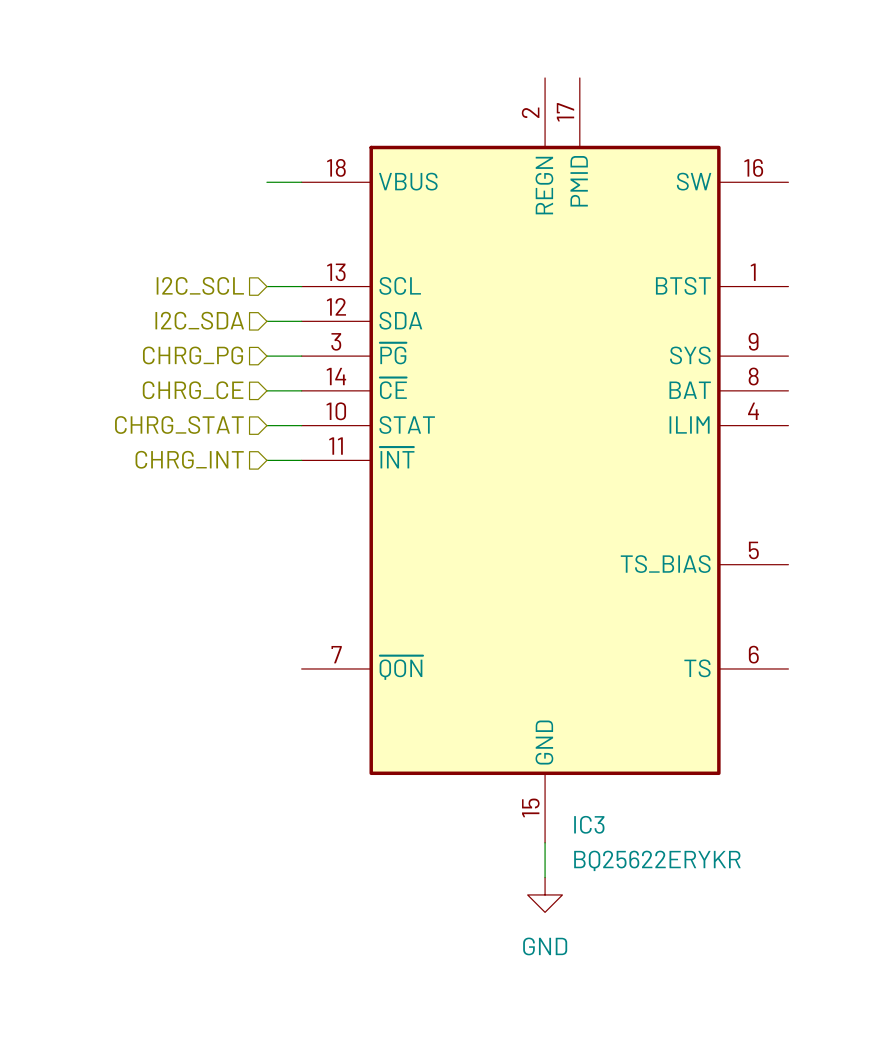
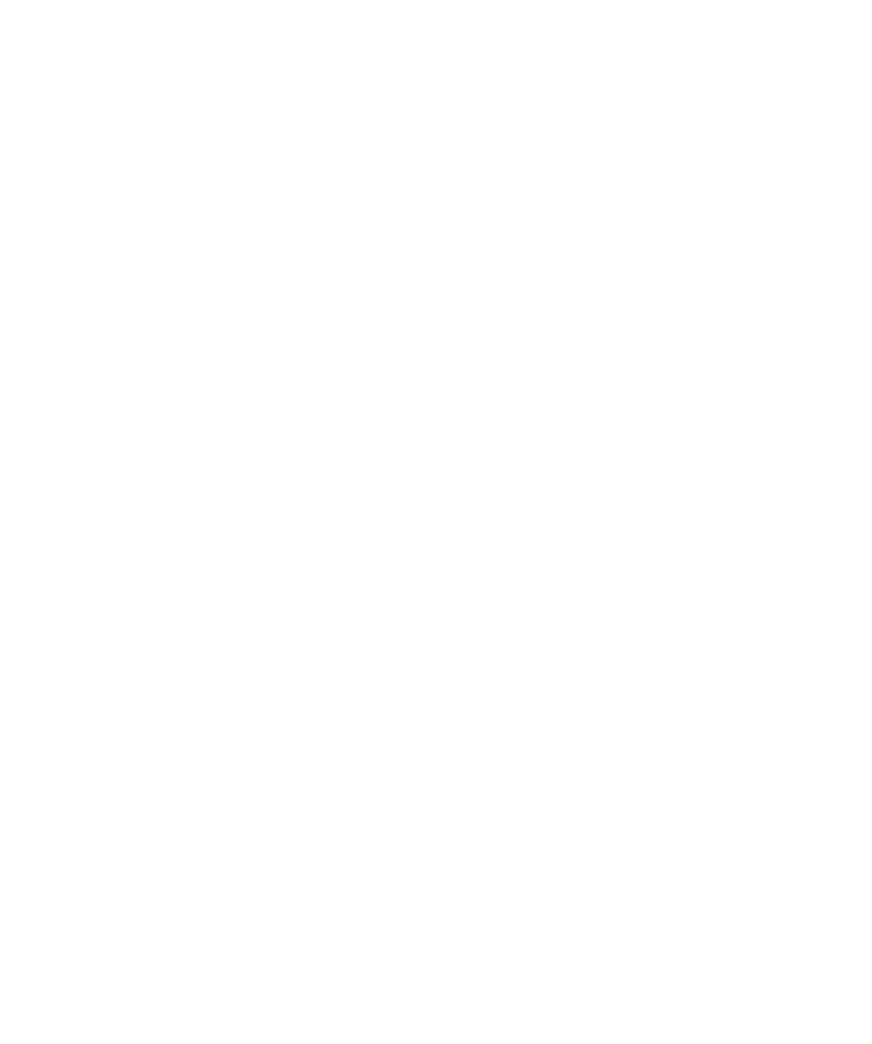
wire: (266, 182) (301, 182) -> none
hierarchical label: I2C_SCL (200, 285) -> none
wire: (266, 286) (301, 286) -> none
hierarchical label: I2C_SDA (199, 320) -> none
wire: (266, 321) (301, 321) -> none
hierarchical label: CHRG_PG (193, 355) -> none
wire: (266, 356) (301, 356) -> none
hierarchical label: CHRG_CE (193, 390) -> none
wire: (266, 390) (301, 390) -> none
hierarchical label: CHRG_STAT (179, 424) -> none
wire: (266, 425) (301, 425) -> none
hierarchical label: CHRG_INT (189, 459) -> none
wire: (266, 460) (301, 460) -> none
IC3: BQ25622ERYKR (545, 460) -> none
wire: (545, 842) (545, 877) -> none
power symbol: GND (545, 894) -> none

